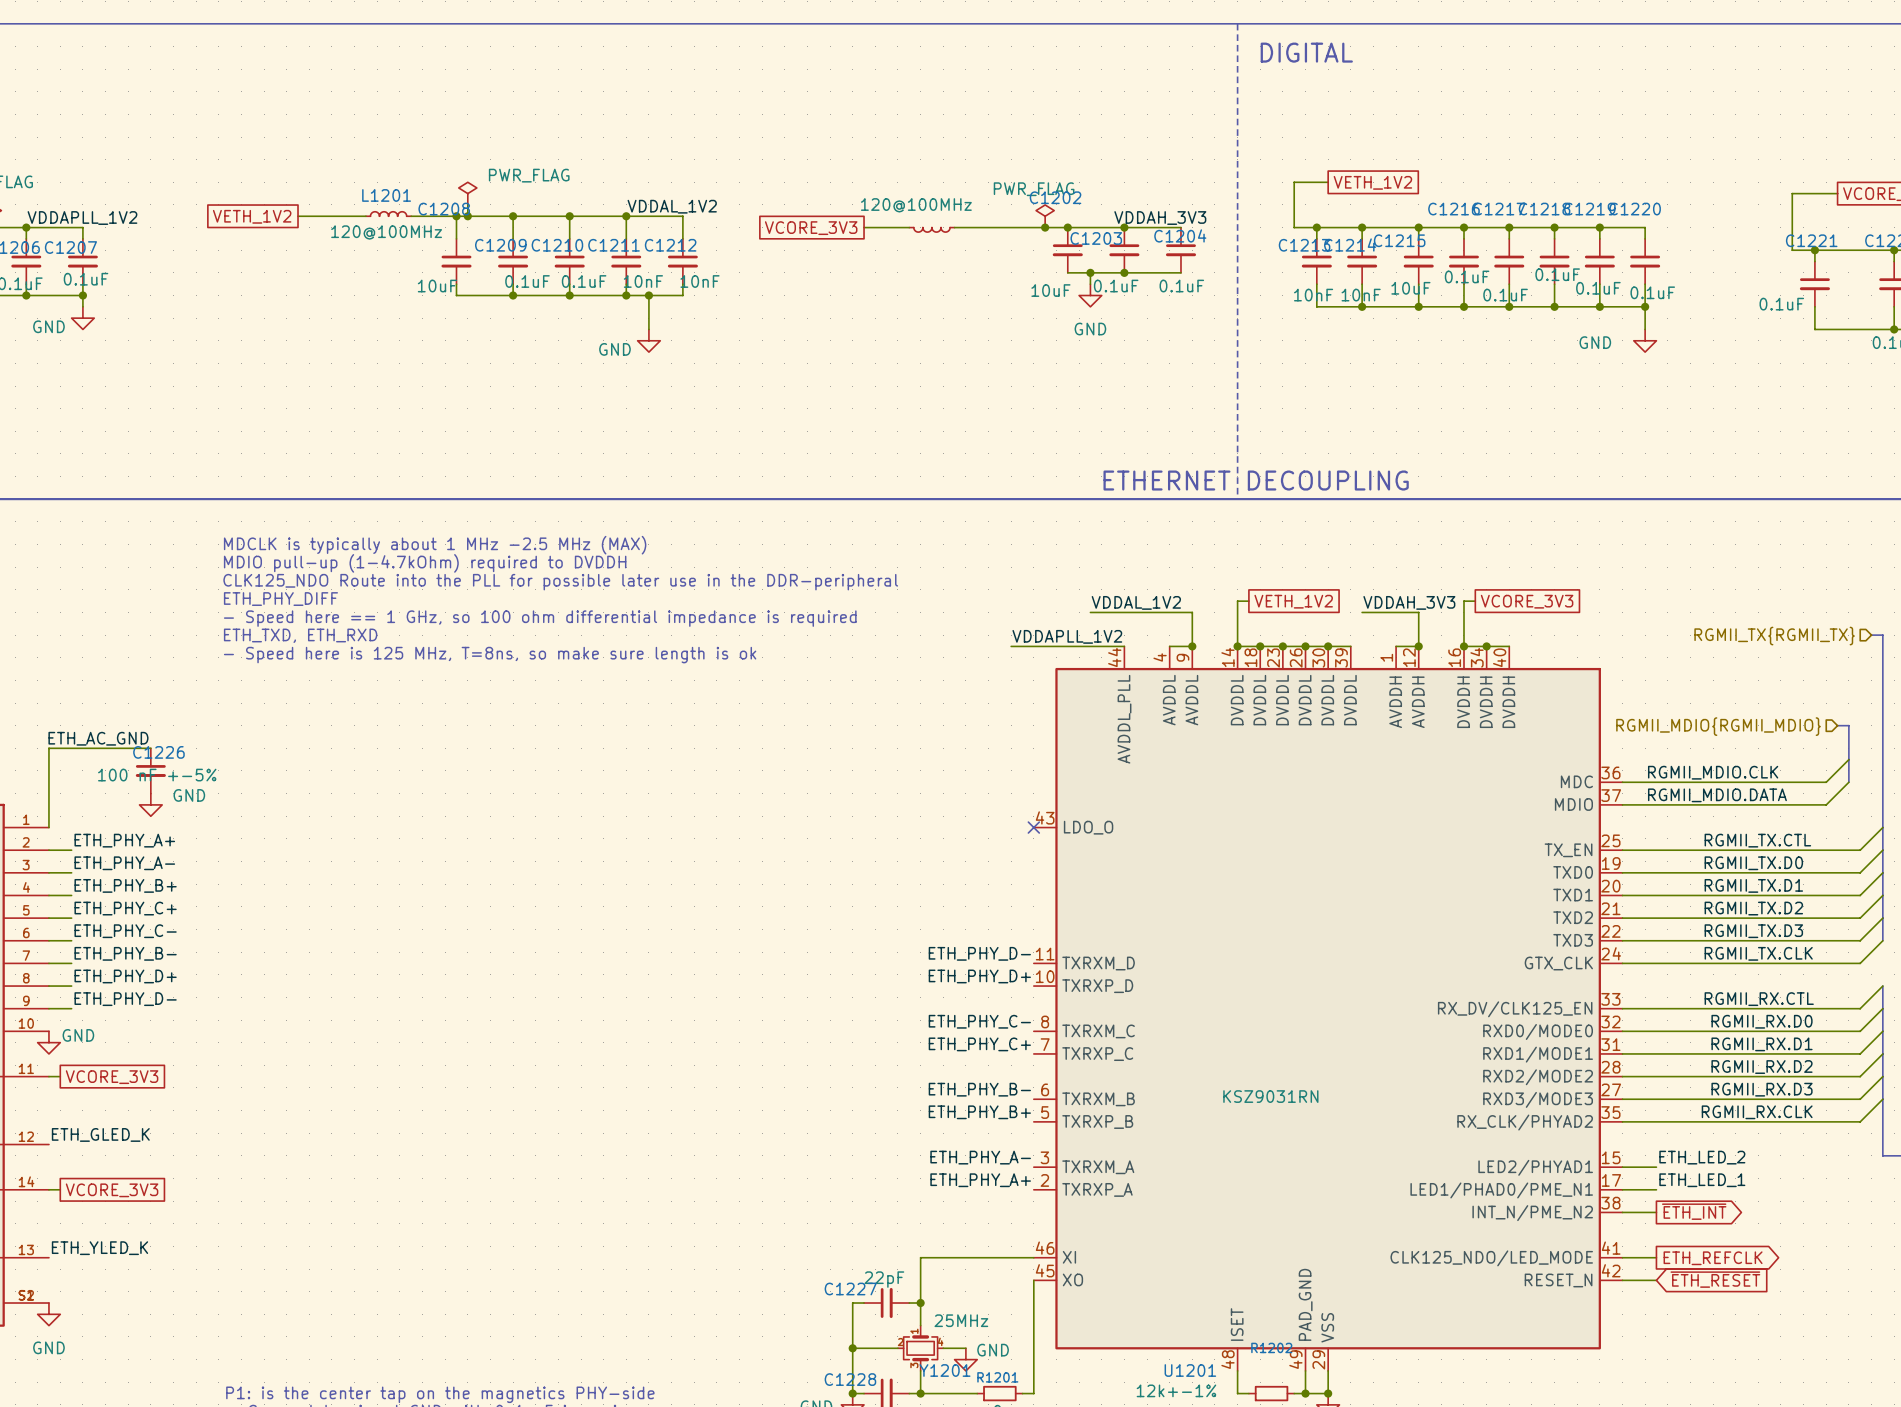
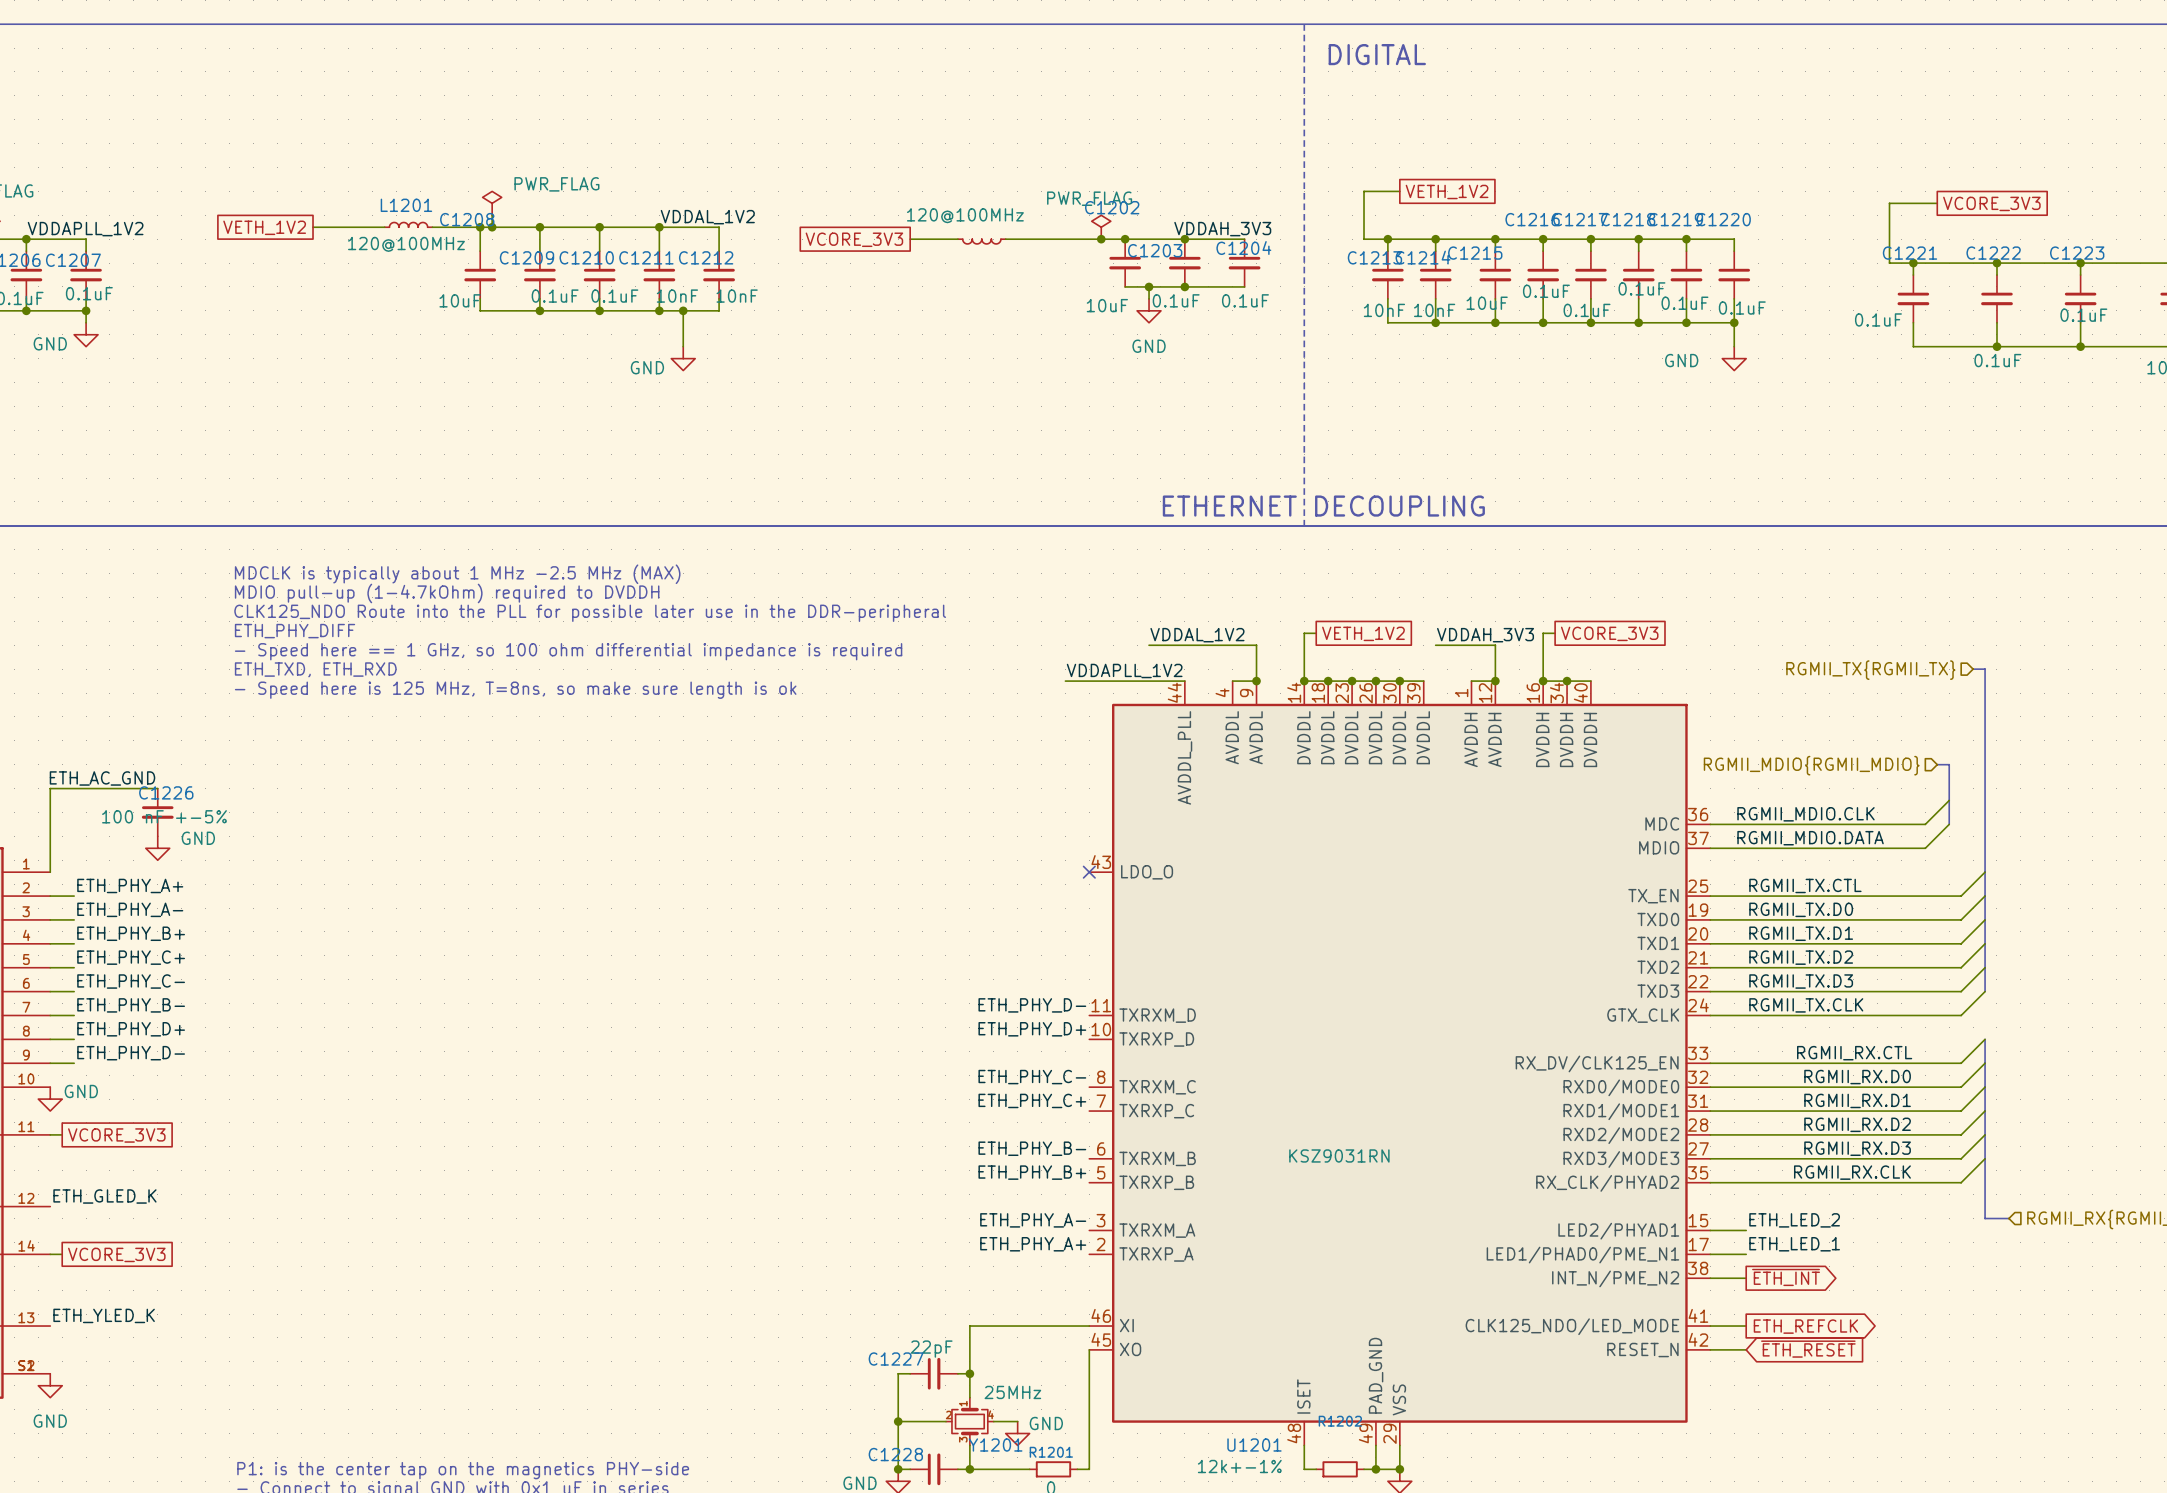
label position: RGMII_TX.CTL (1757, 840) -> RGMII_TX.CTL (1805, 885)
label position: RGMII_TX.D0 (1753, 863) -> RGMII_TX.D0 (1801, 909)
label position: RGMII_TX.D1 (1753, 885) -> RGMII_TX.D1 (1801, 933)
label position: RGMII_TX.D2 (1753, 908) -> RGMII_TX.D2 (1801, 957)
label position: RGMII_TX.D3 (1753, 931) -> RGMII_TX.D3 (1801, 981)
label position: RGMII_TX.CLK (1758, 953) -> RGMII_TX.CLK (1806, 1005)

